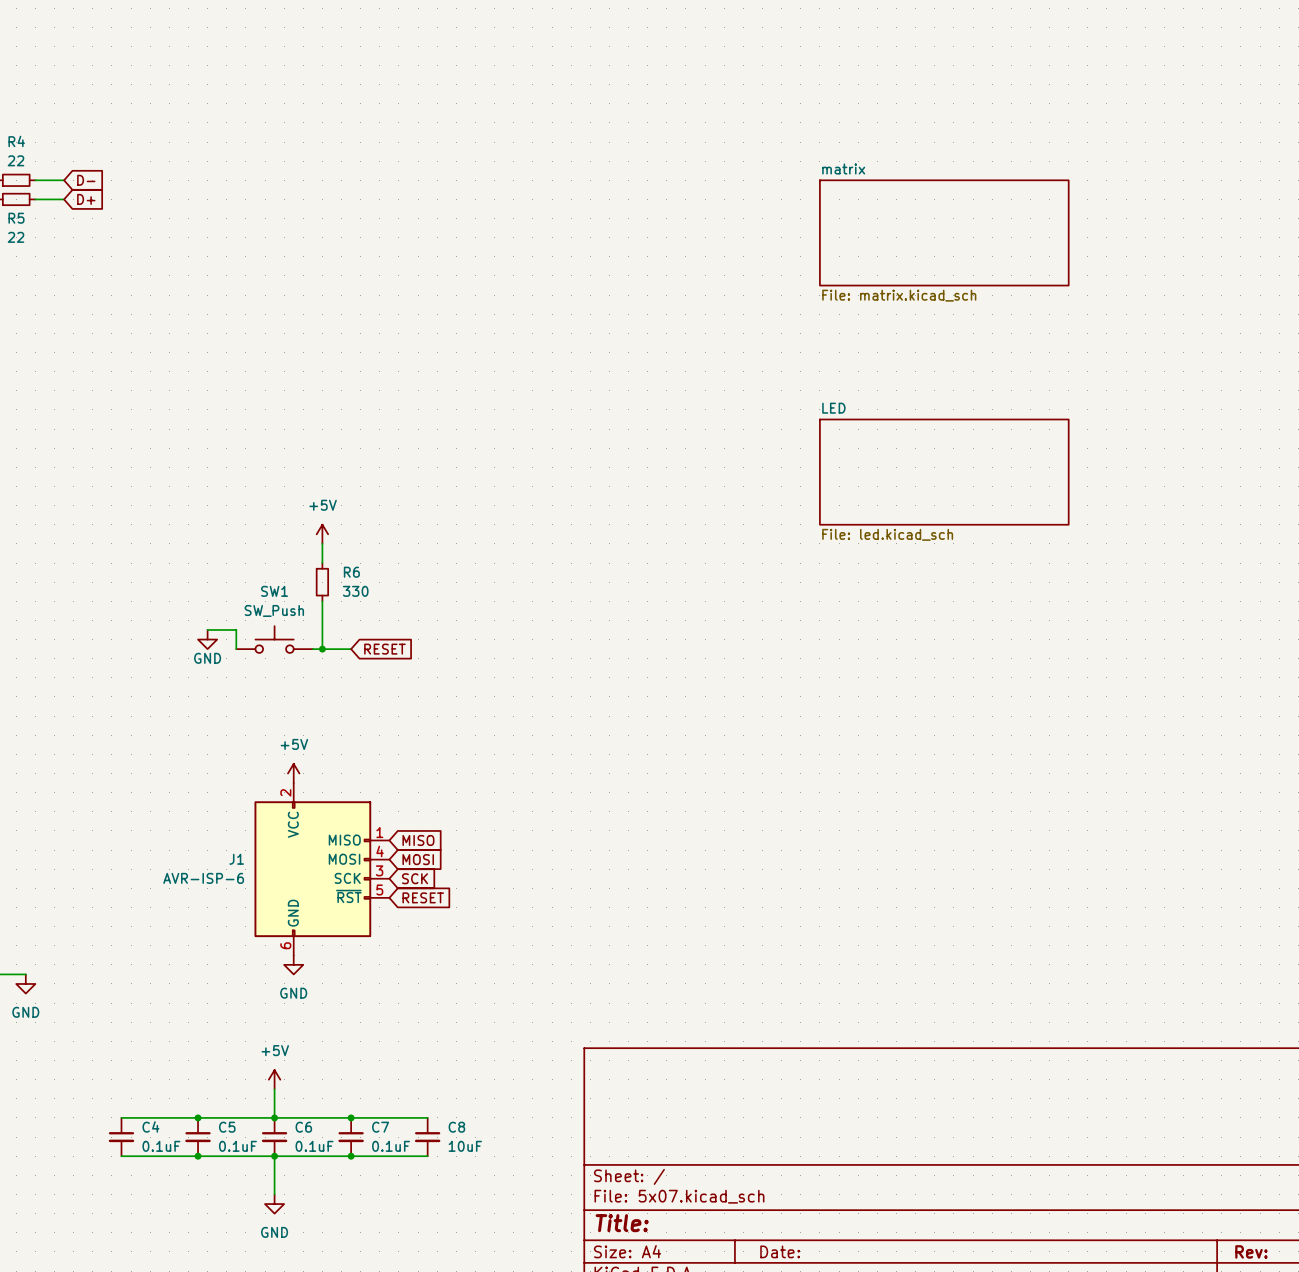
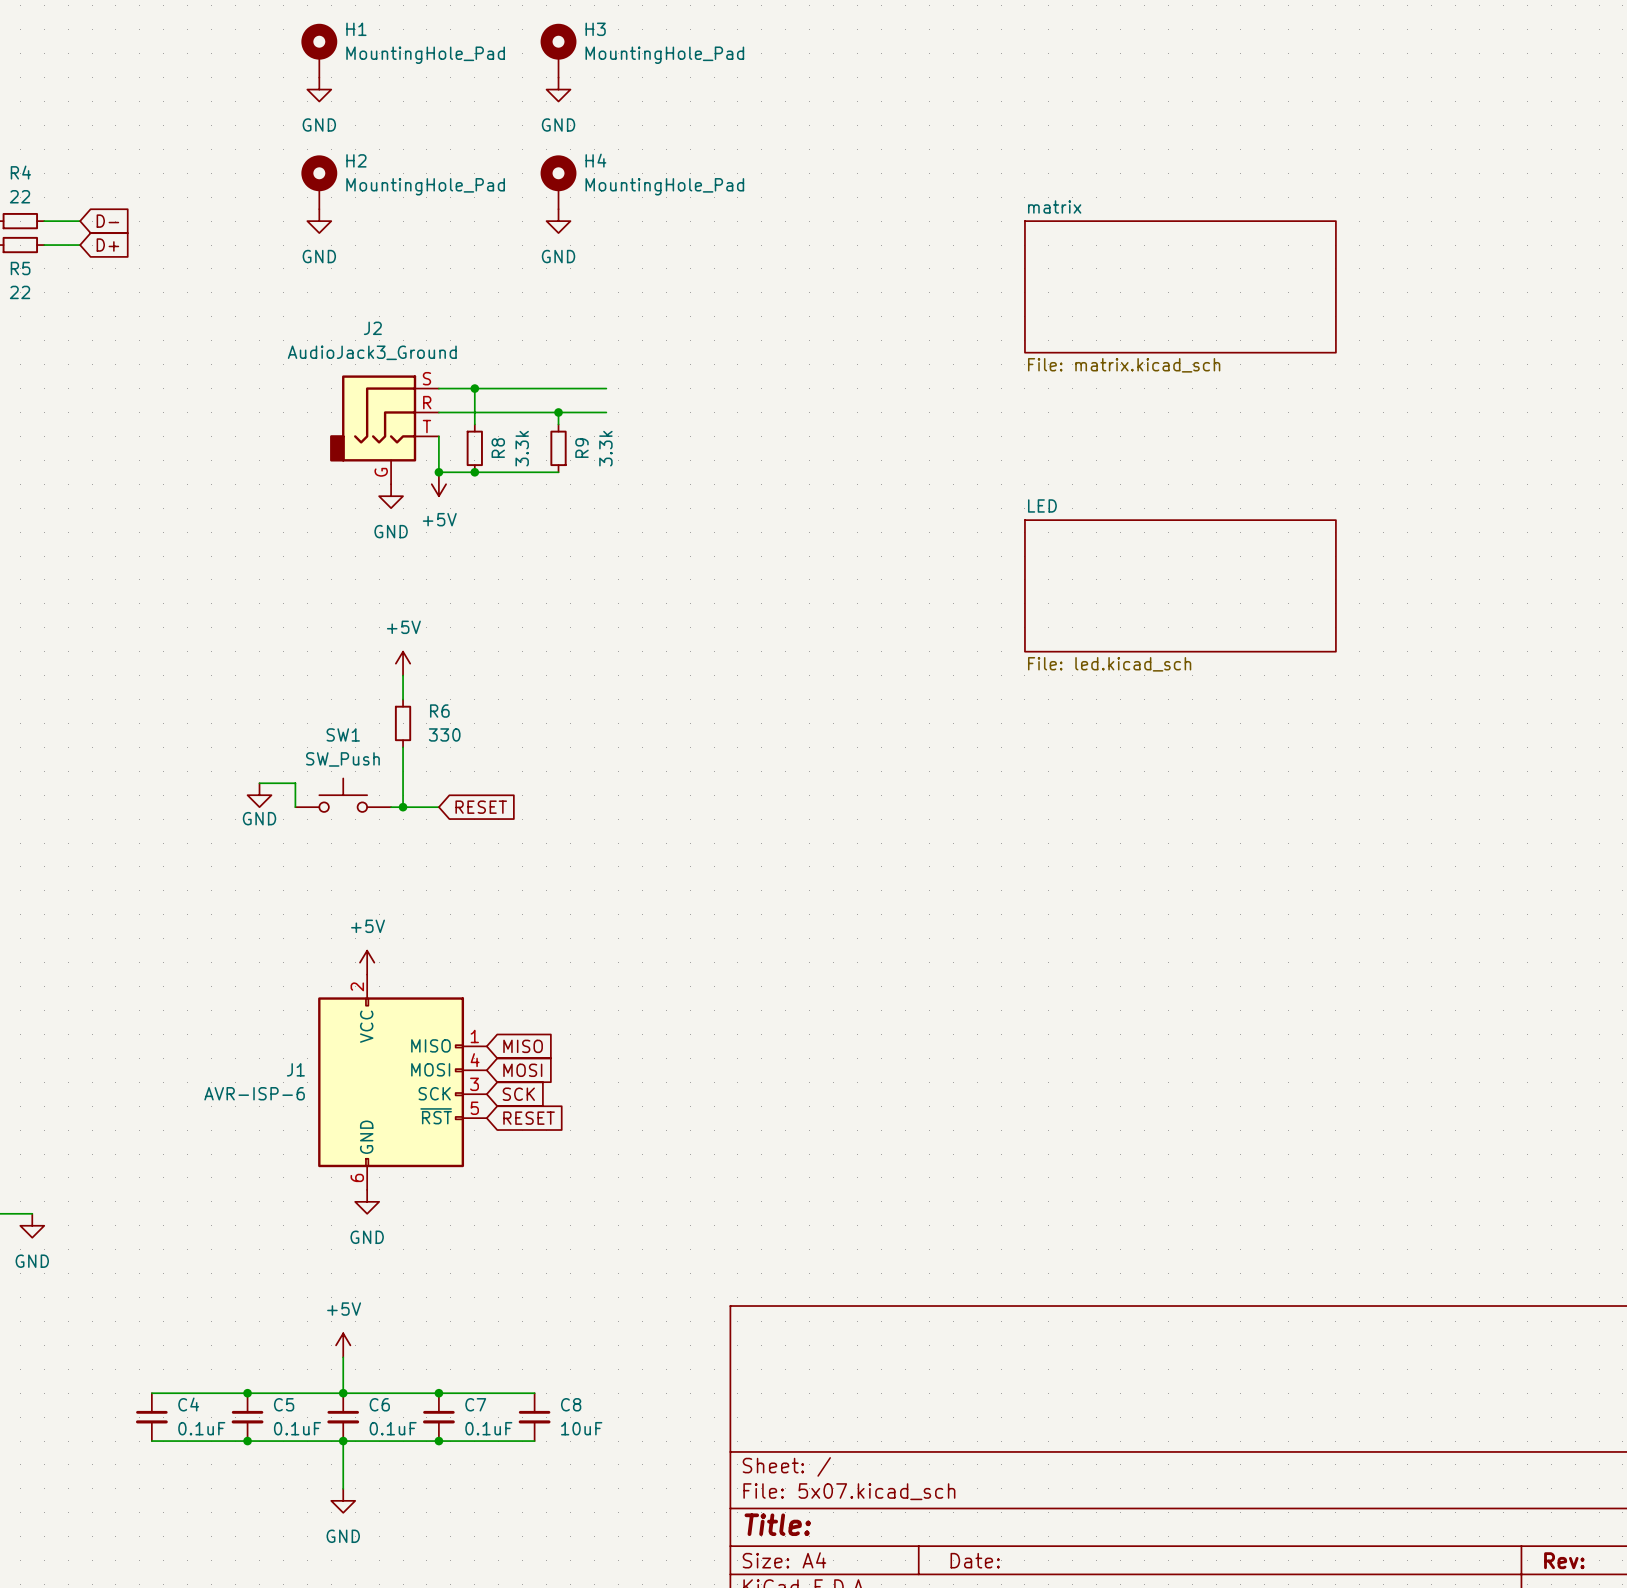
H1: none -> MountingHole_Pad (319, 50)
H3: none -> MountingHole_Pad (558, 50)
power symbol: none -> GND (319, 89)
power symbol: none -> GND (558, 89)
H2: none -> MountingHole_Pad (319, 182)
H4: none -> MountingHole_Pad (558, 182)
power symbol: none -> GND (319, 221)
power symbol: none -> GND (558, 221)
wire: none -> (438, 388) (606, 388)
wire: none -> (474, 388) (474, 424)
junction: none -> (474, 388)
wire: none -> (438, 412) (606, 412)
wire: none -> (558, 412) (558, 424)
junction: none -> (558, 412)
J2: none -> AudioJack3_Ground (384, 429)
wire: none -> (438, 436) (438, 472) (558, 472)
R8: none -> 3.3k (474, 448)
R9: none -> 3.3k (558, 448)
junction: none -> (438, 472)
junction: none -> (474, 472)
power symbol: none -> +5V (438, 484)
power symbol: none -> GND (391, 496)

